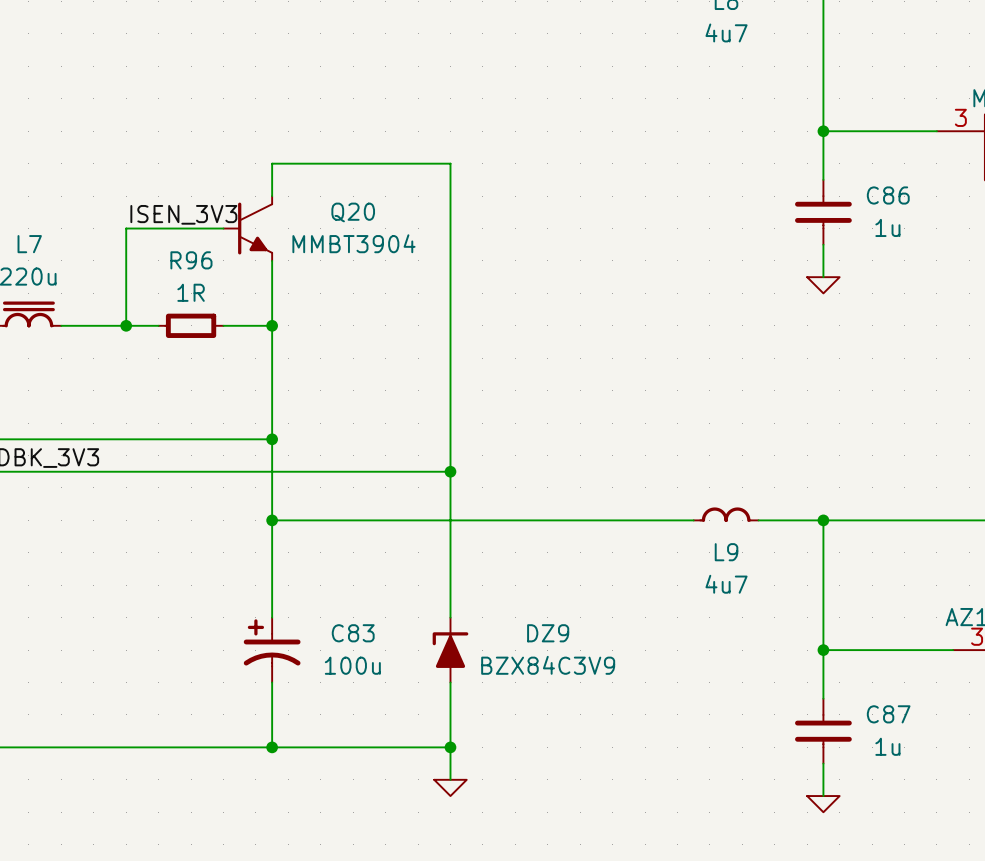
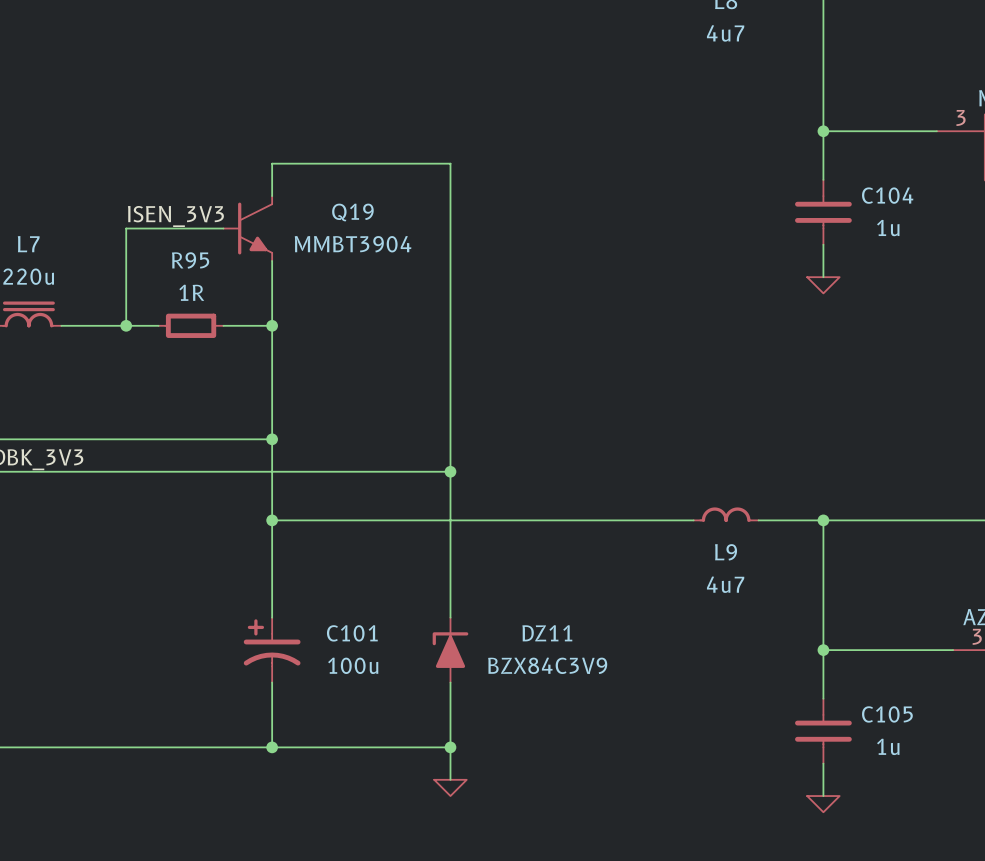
C86 name: C86 (888, 195) -> C104 (887, 195)
Q20 name: Q20 (353, 212) -> Q19 (352, 212)
R96 name: R96 (191, 260) -> R95 (190, 260)
C83 name: C83 (353, 633) -> C101 (352, 633)
DZ9 name: DZ9 (548, 633) -> DZ11 (547, 633)
C87 name: C87 (888, 714) -> C105 (887, 714)

